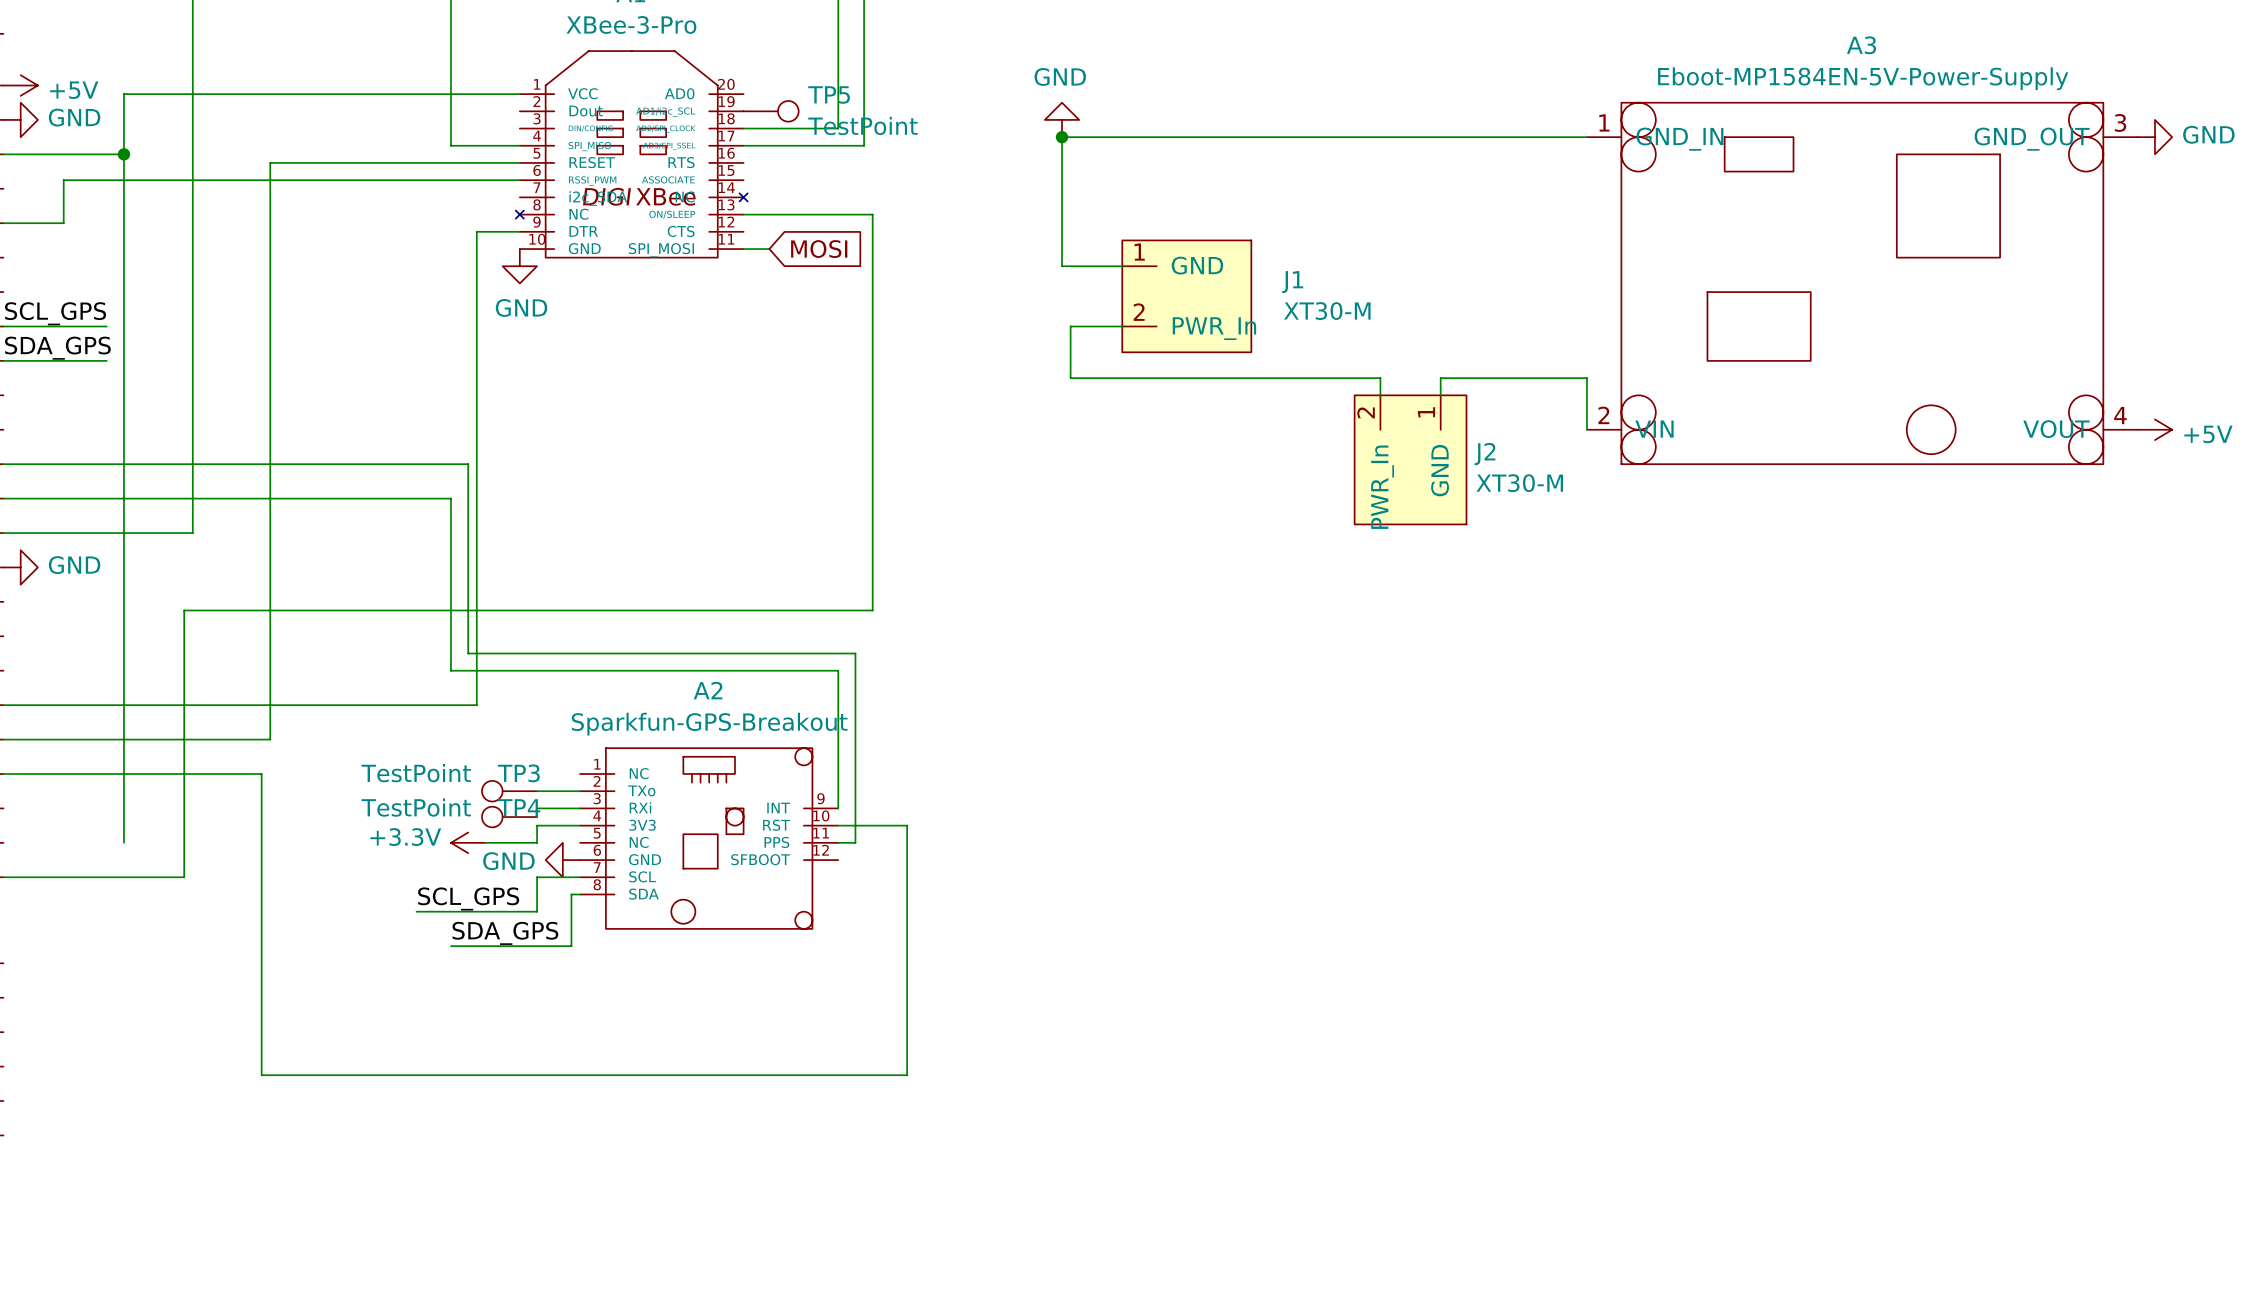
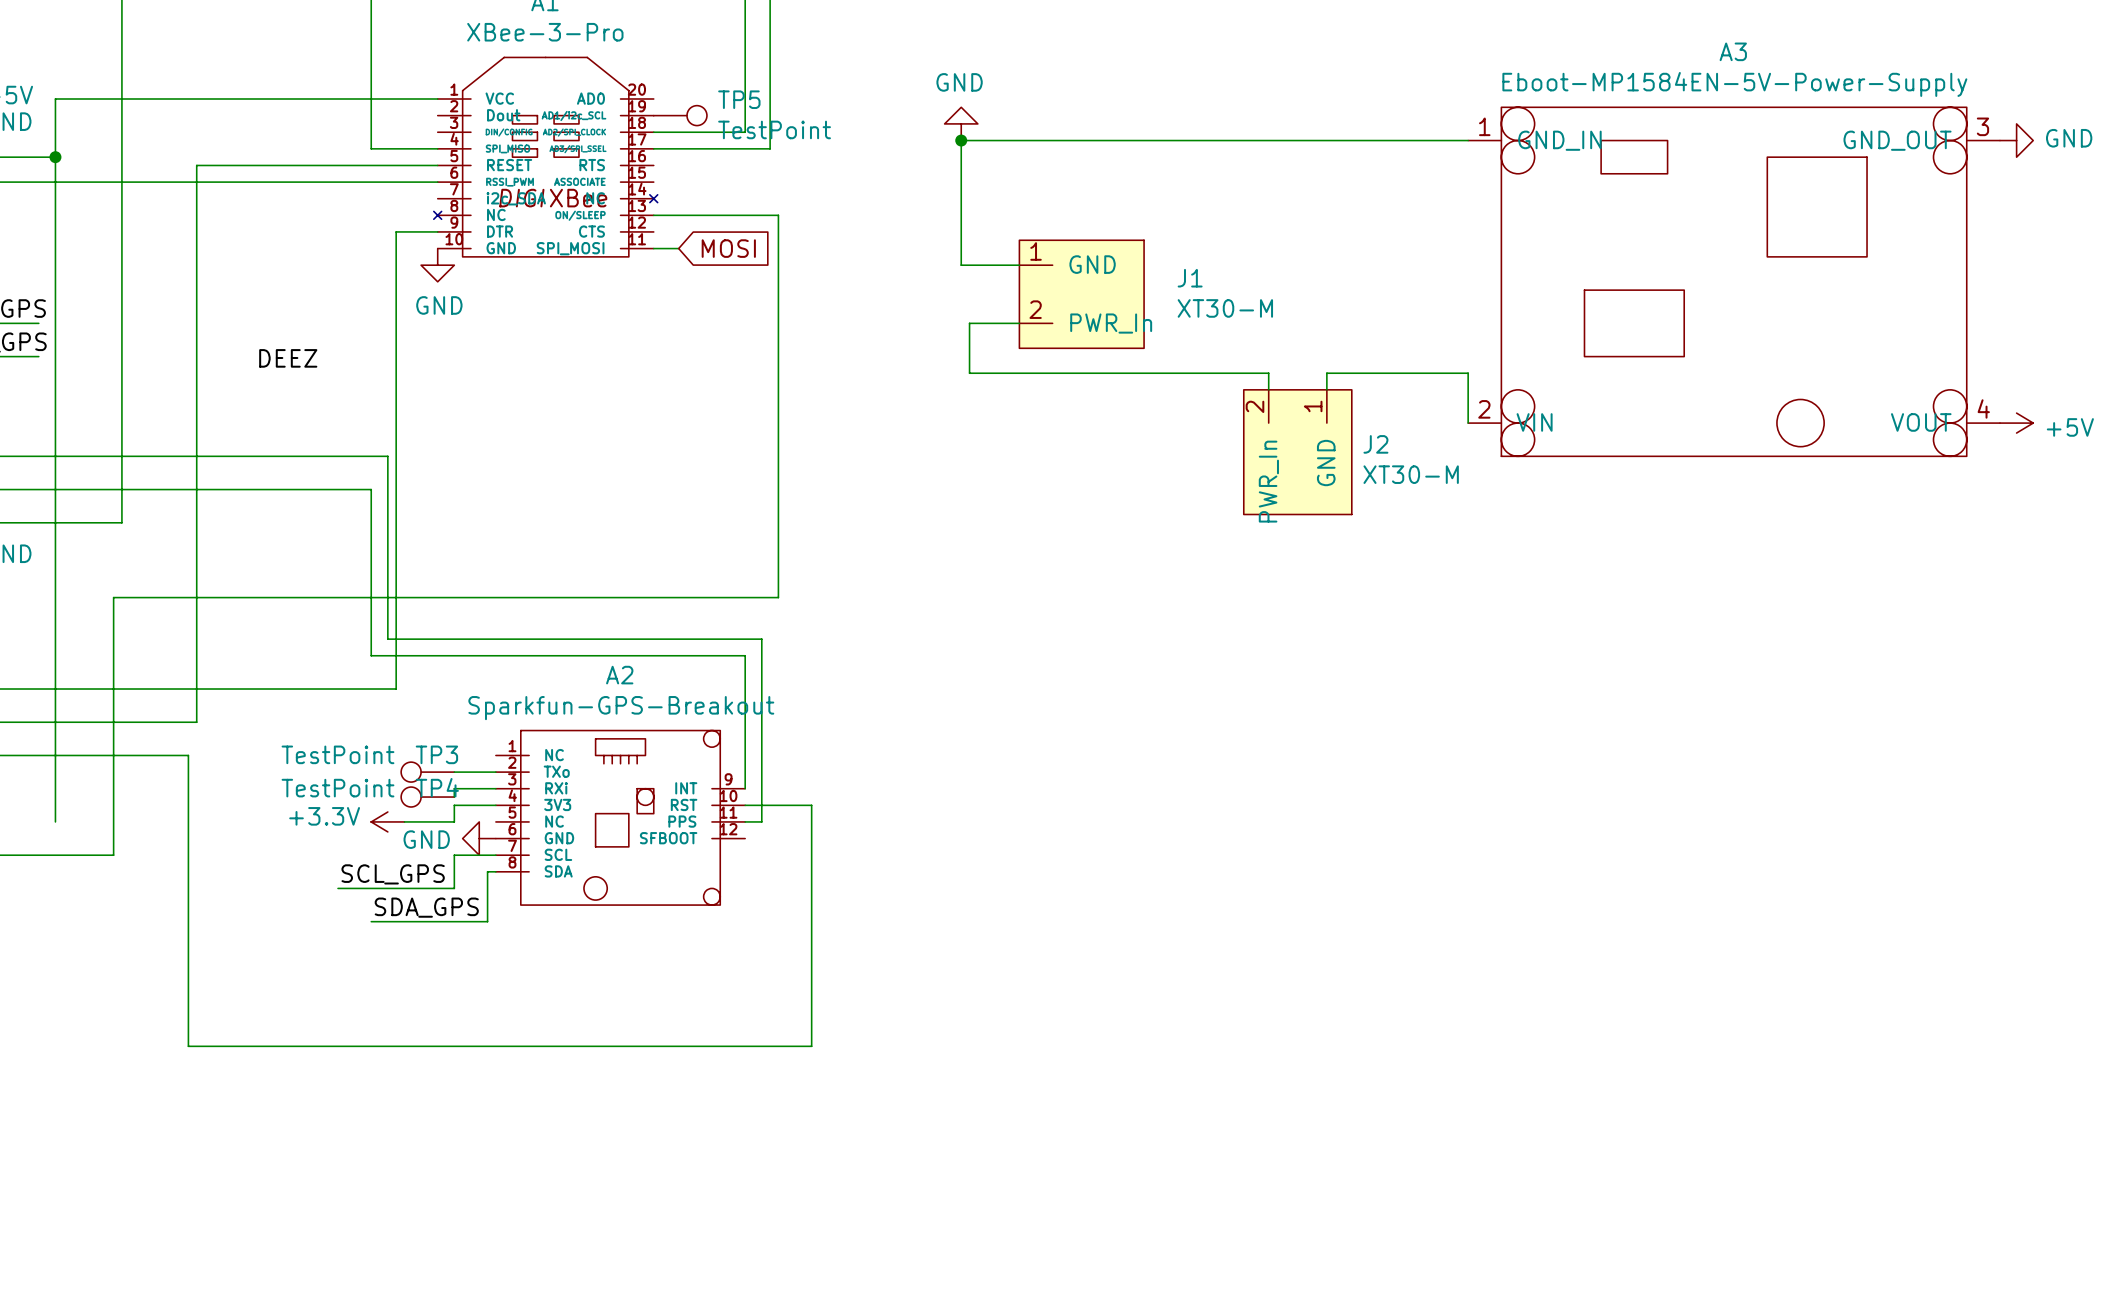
label: none -> DEEZ (288, 358)

